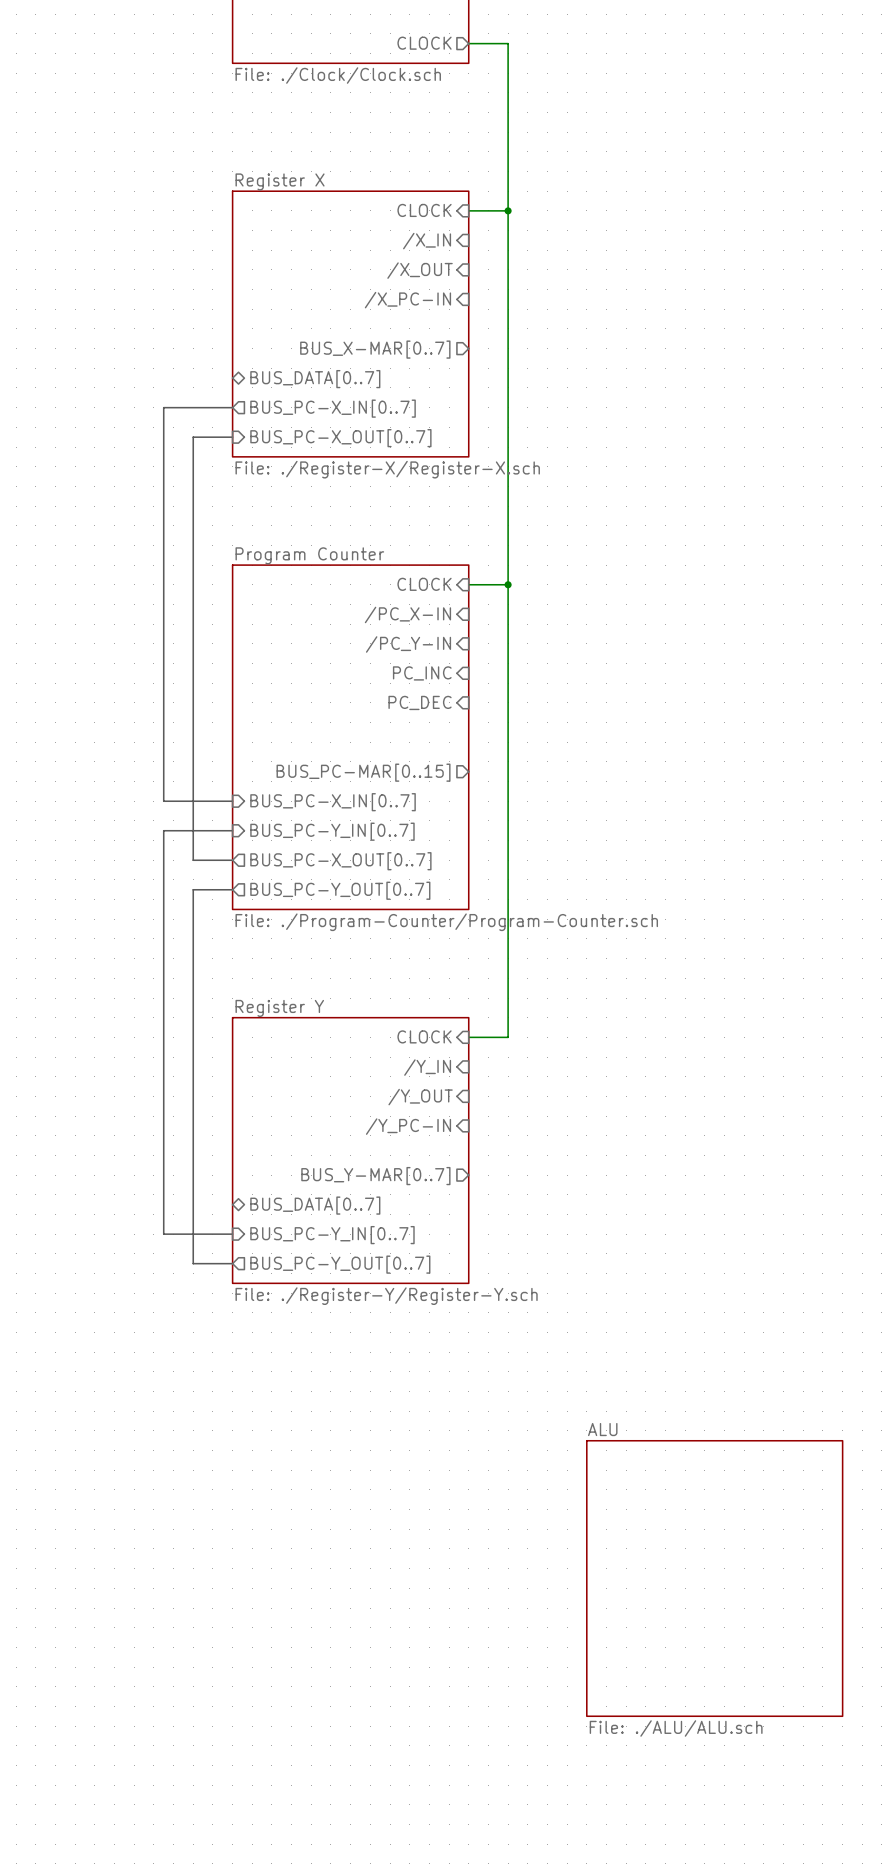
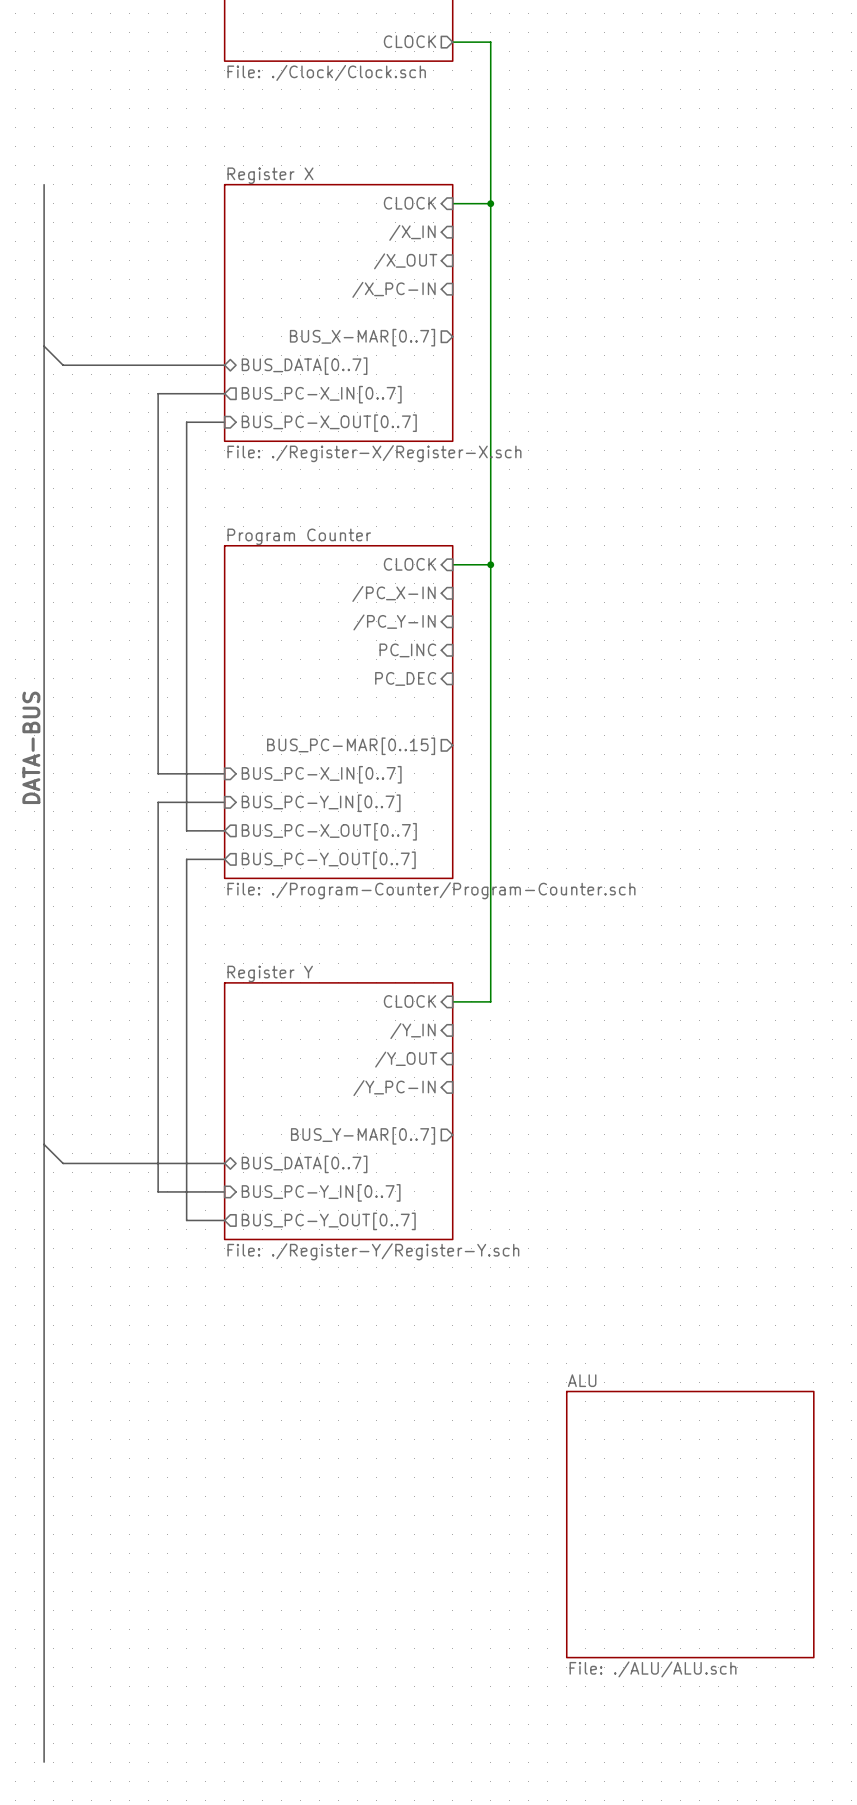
bus: none -> (44, 184) (44, 1762)
bus: none -> (44, 346) (63, 365) (224, 365)
label: none -> DATA-BUS (31, 747)
bus: none -> (44, 1144) (63, 1163) (224, 1163)

